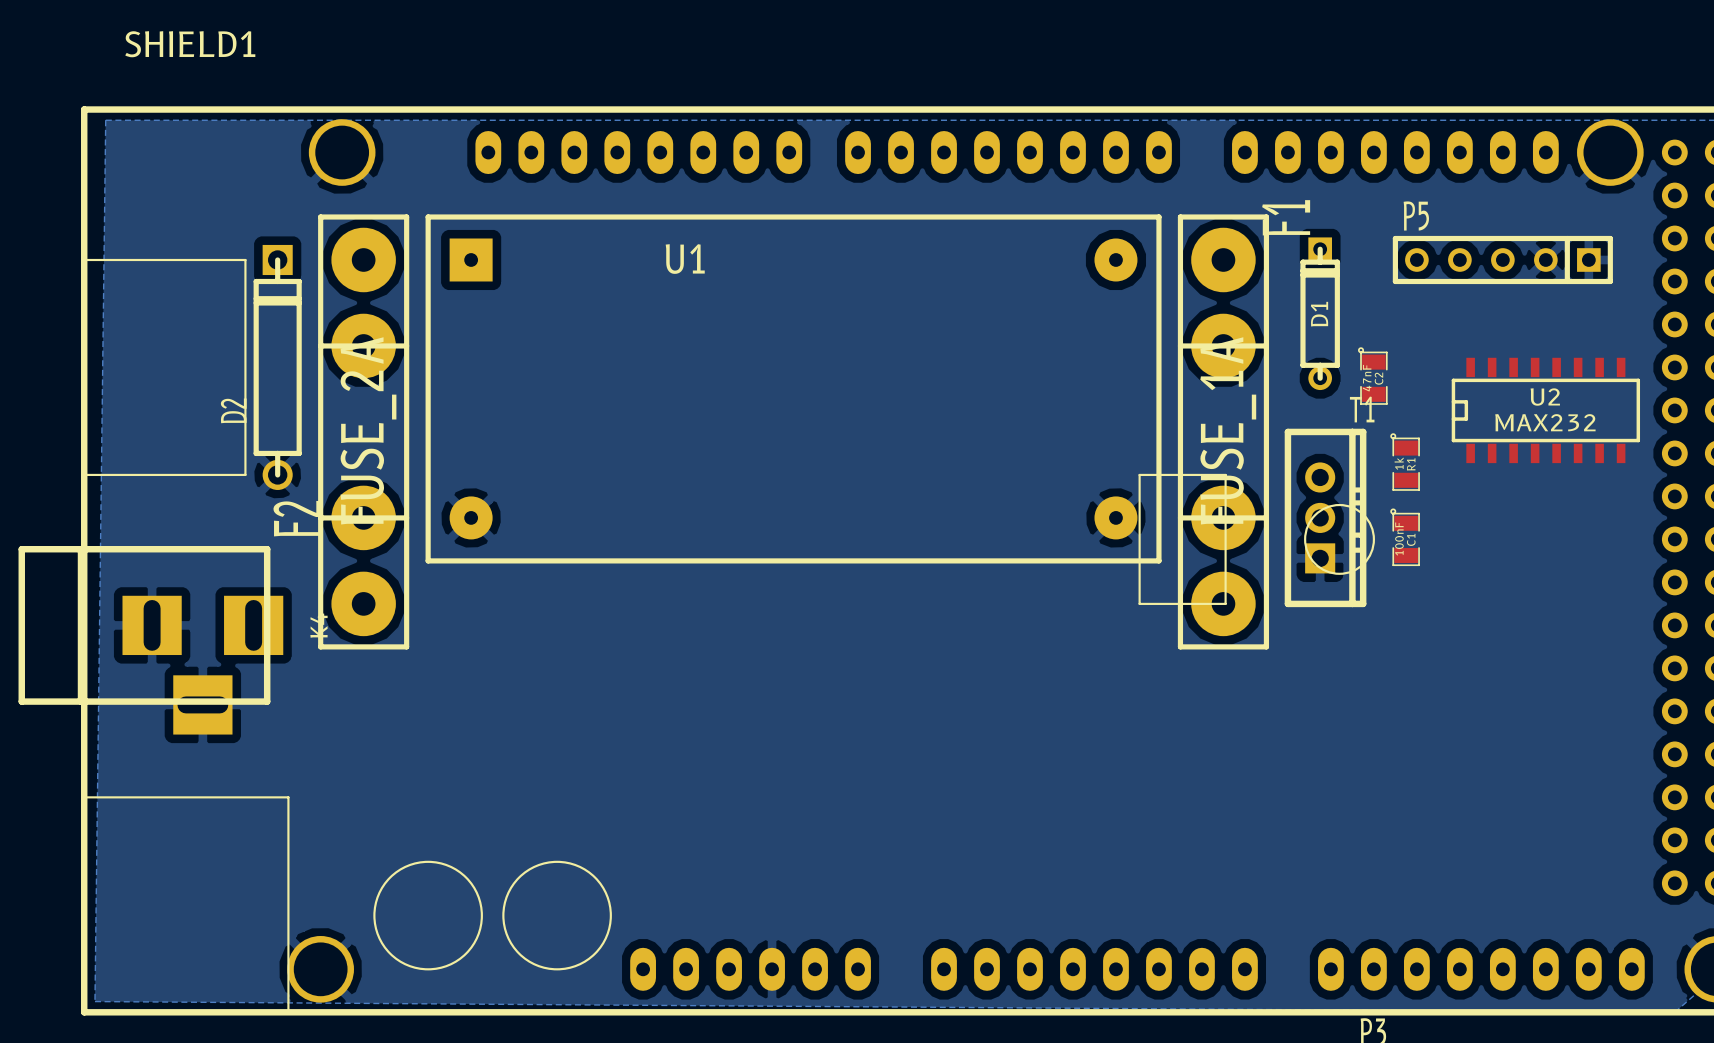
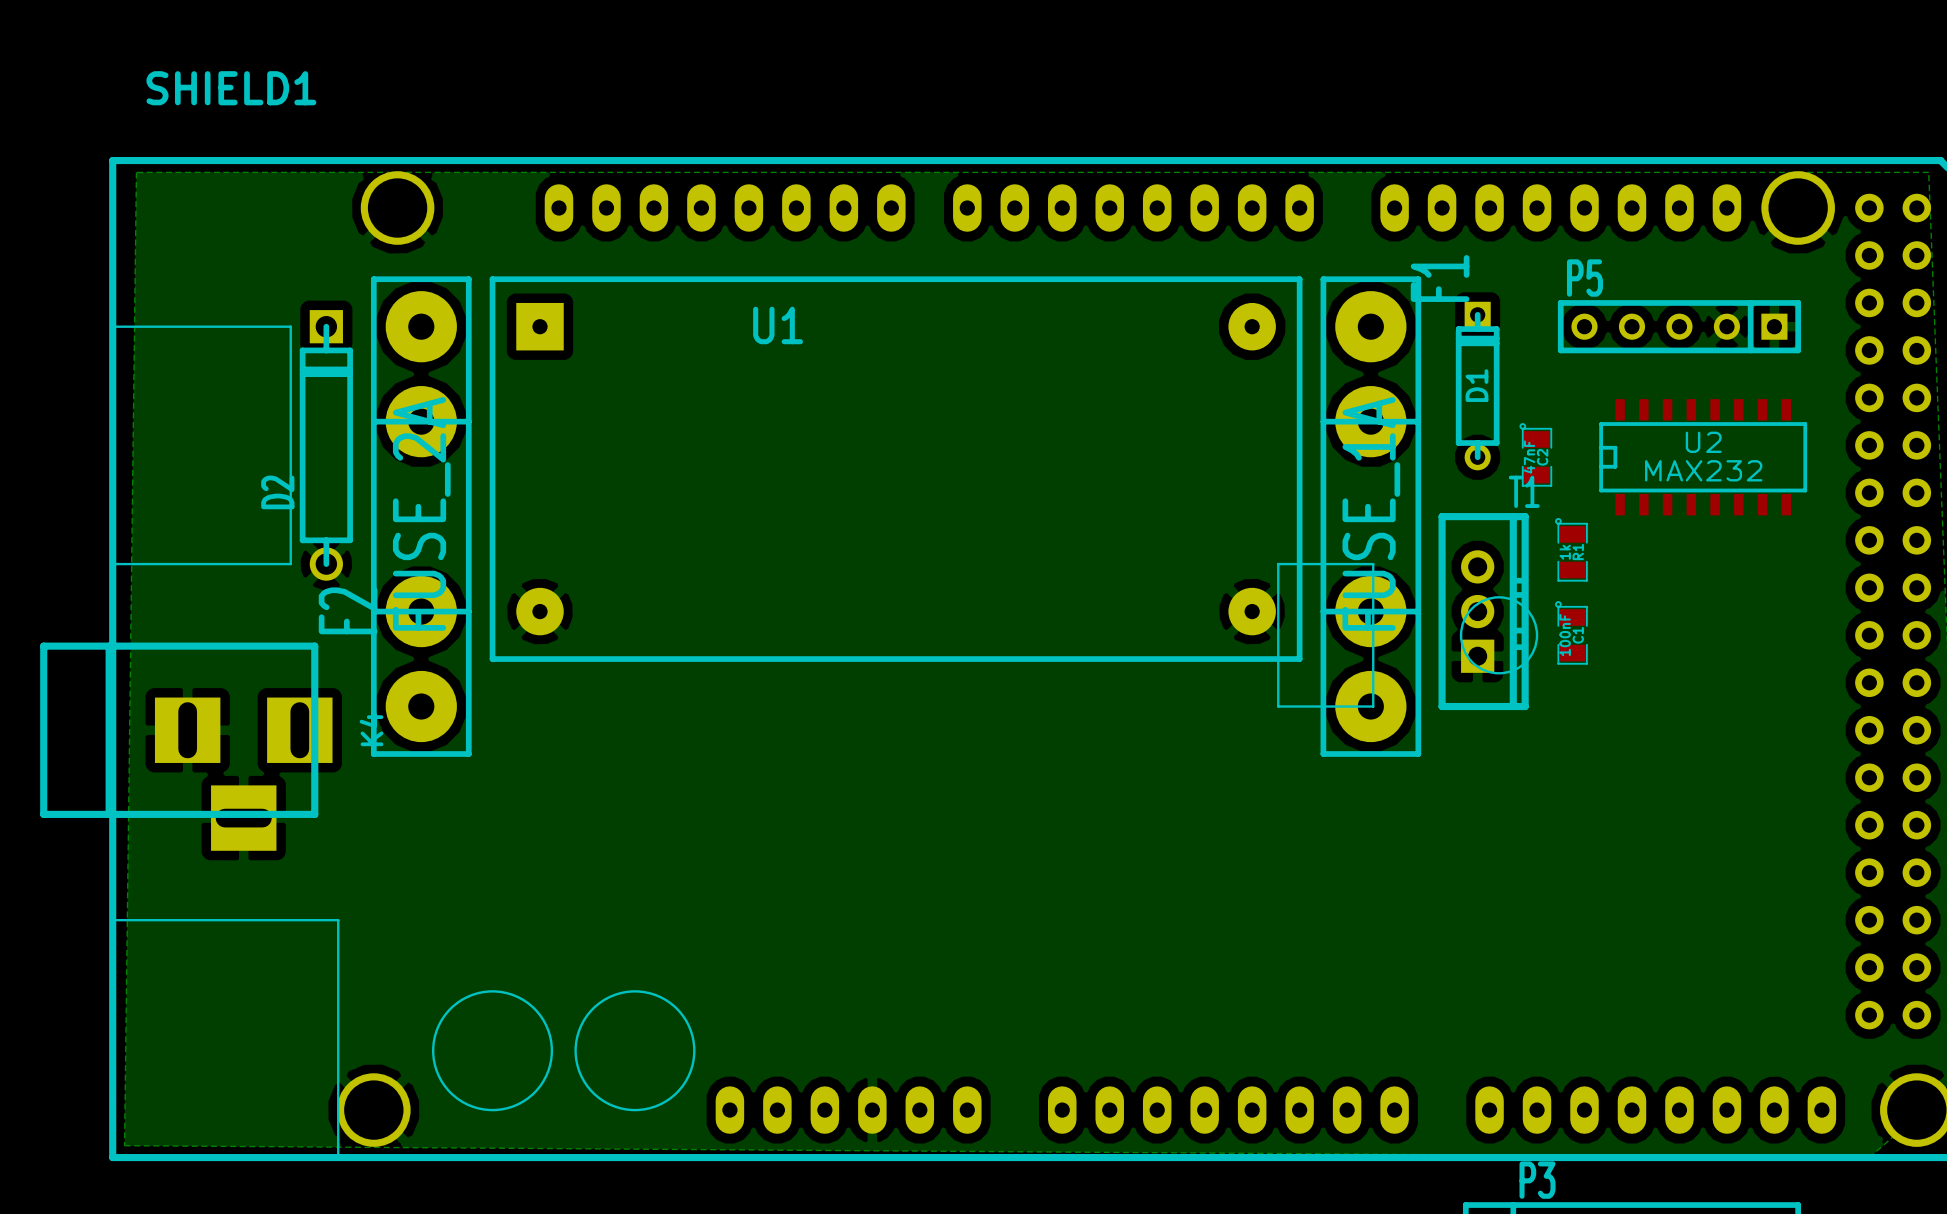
U2 position: (1545, 410) -> (1703, 457)

